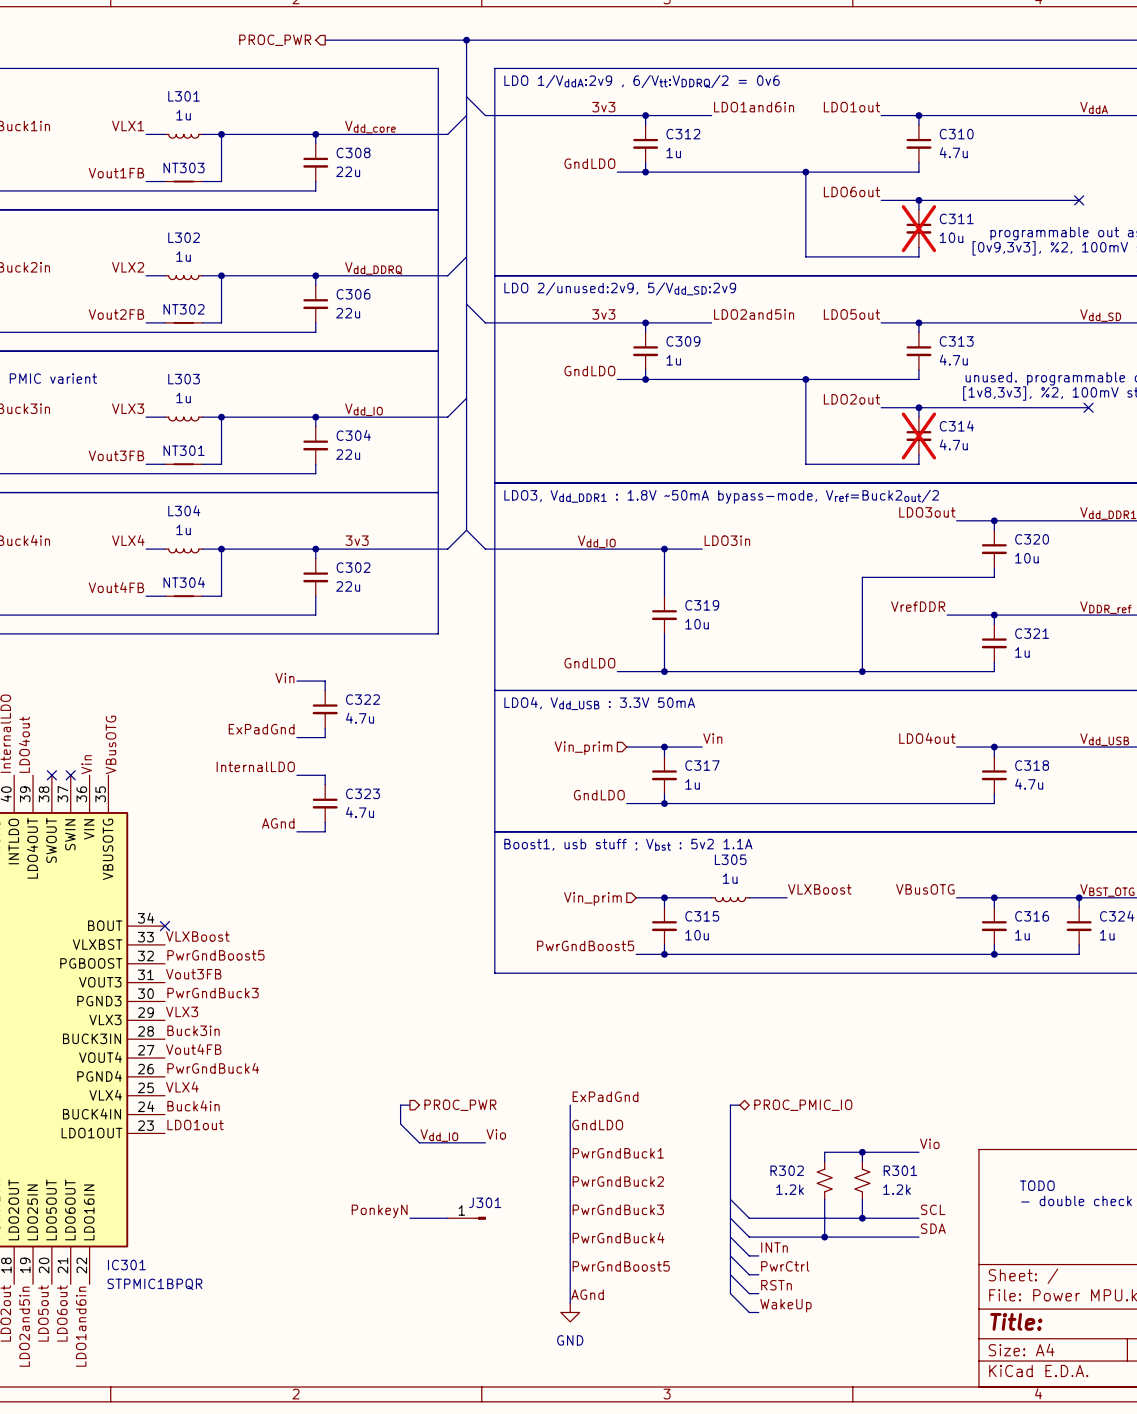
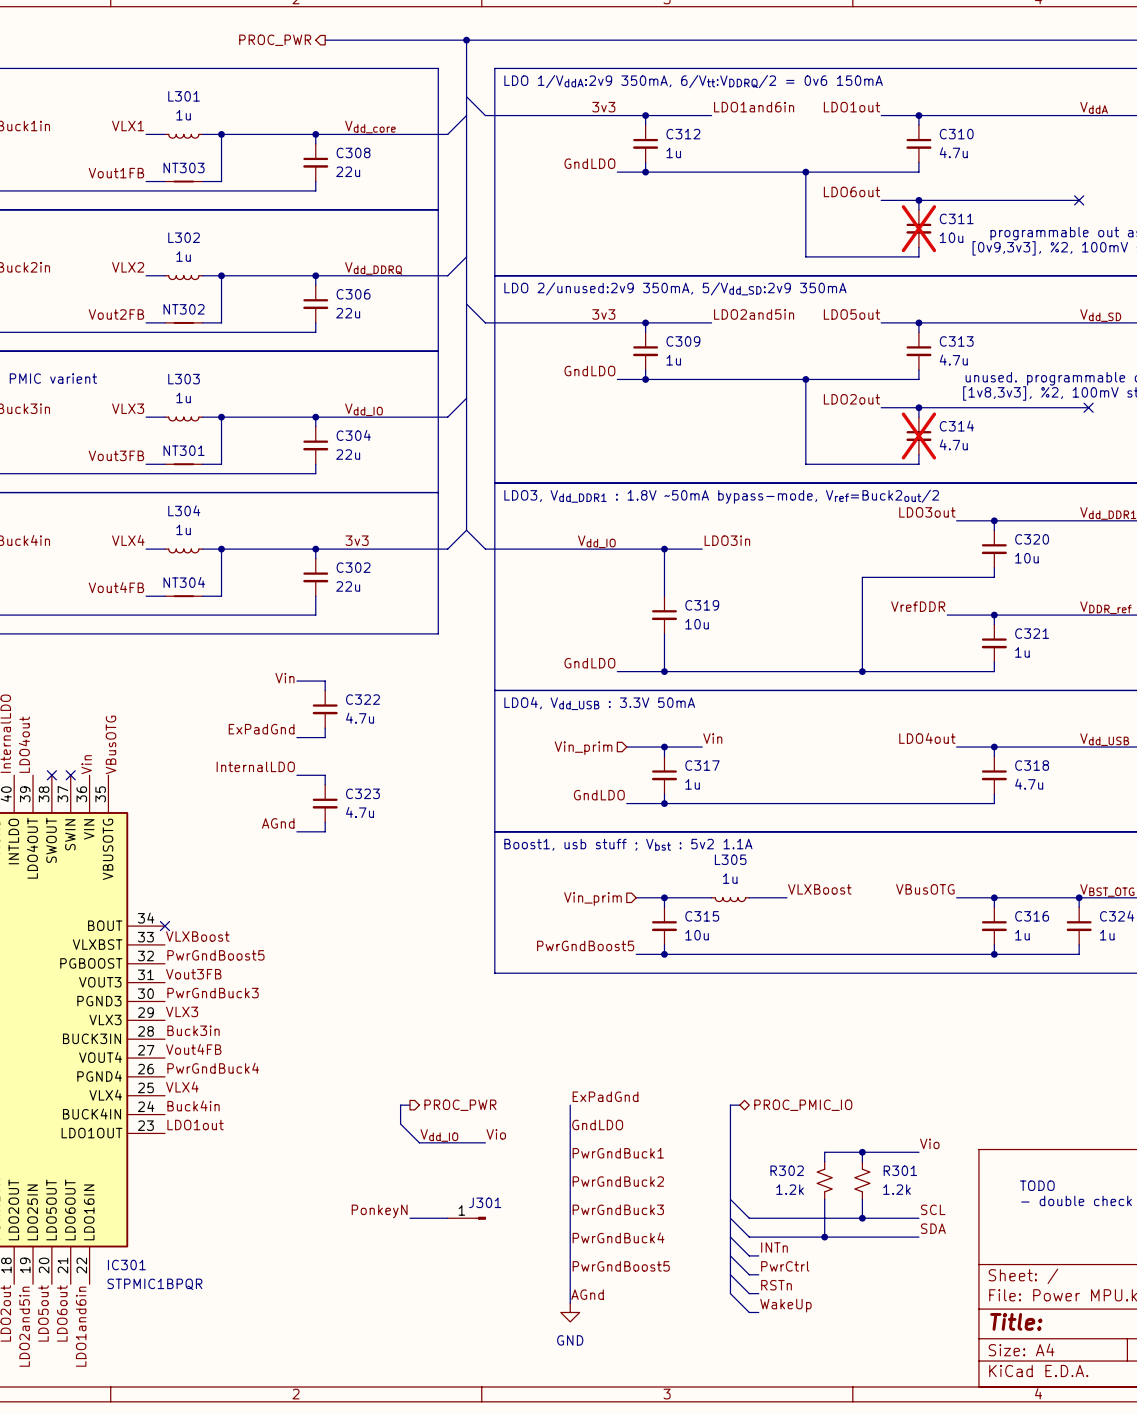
text: LDO 1/VddA:2v9 , 6/Vtt:VDDRQ/2 = 0v6 (641, 81) -> LDO 1/VddA:2v9 350mA, 6/Vtt:VDDRQ/2 = 0v6 150mA (693, 81)
text: LDO 2/unused:2v9, 5/Vdd_SD:2v9 (620, 288) -> LDO 2/unused:2v9 350mA, 5/Vdd_SD:2v9 350mA (675, 288)

